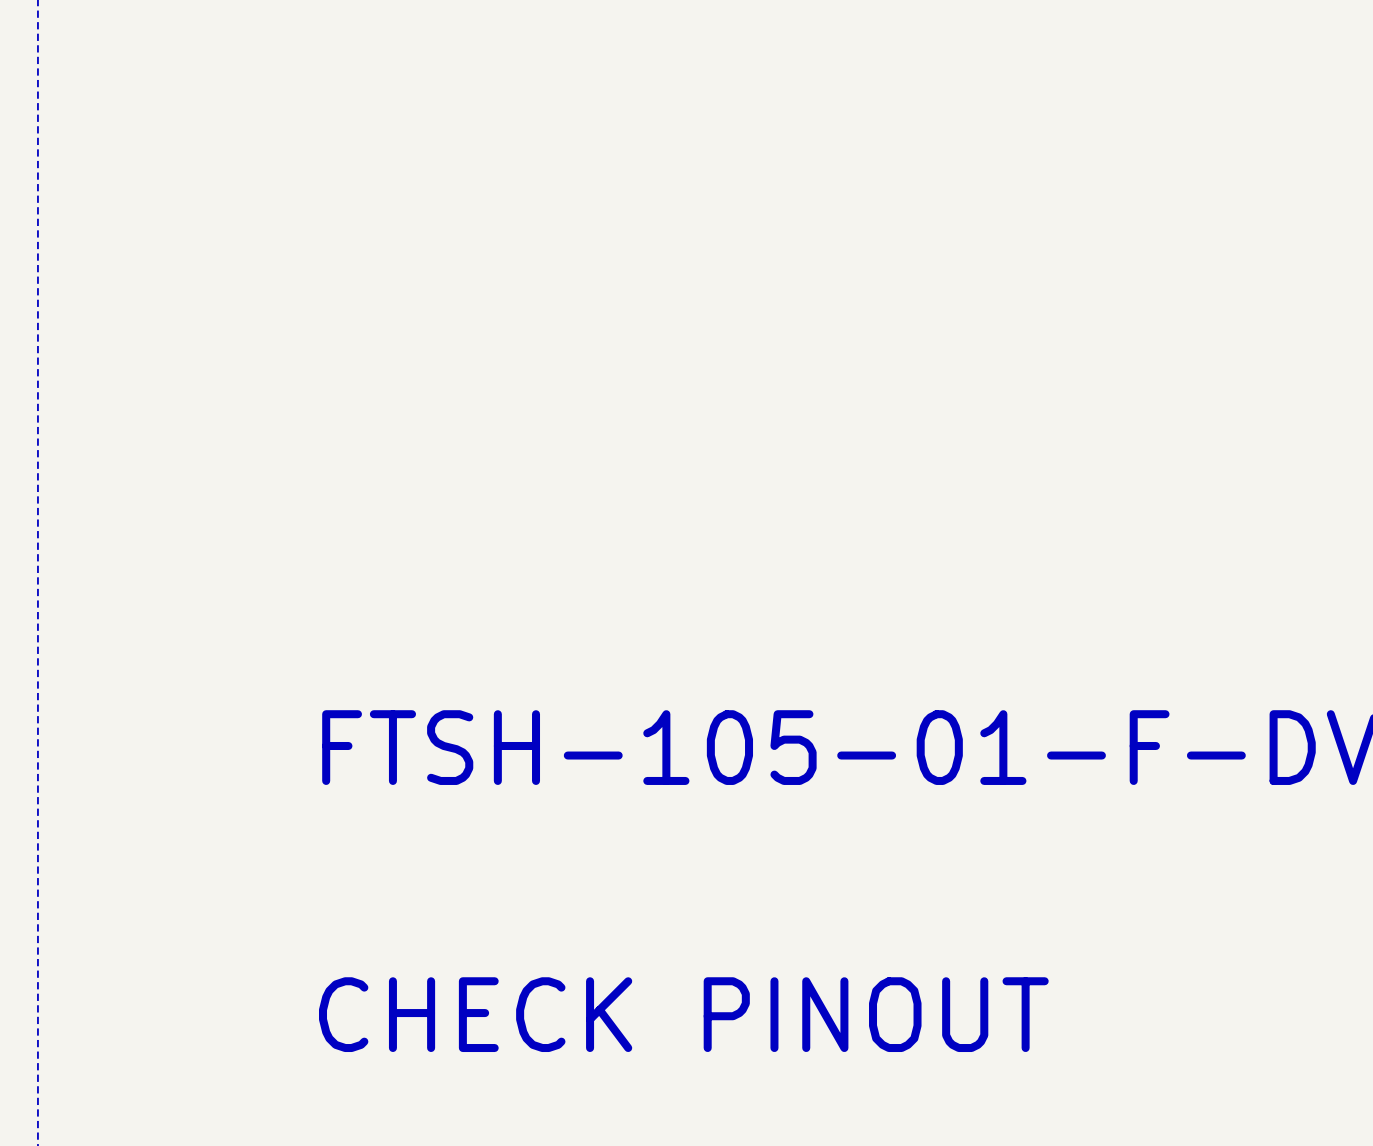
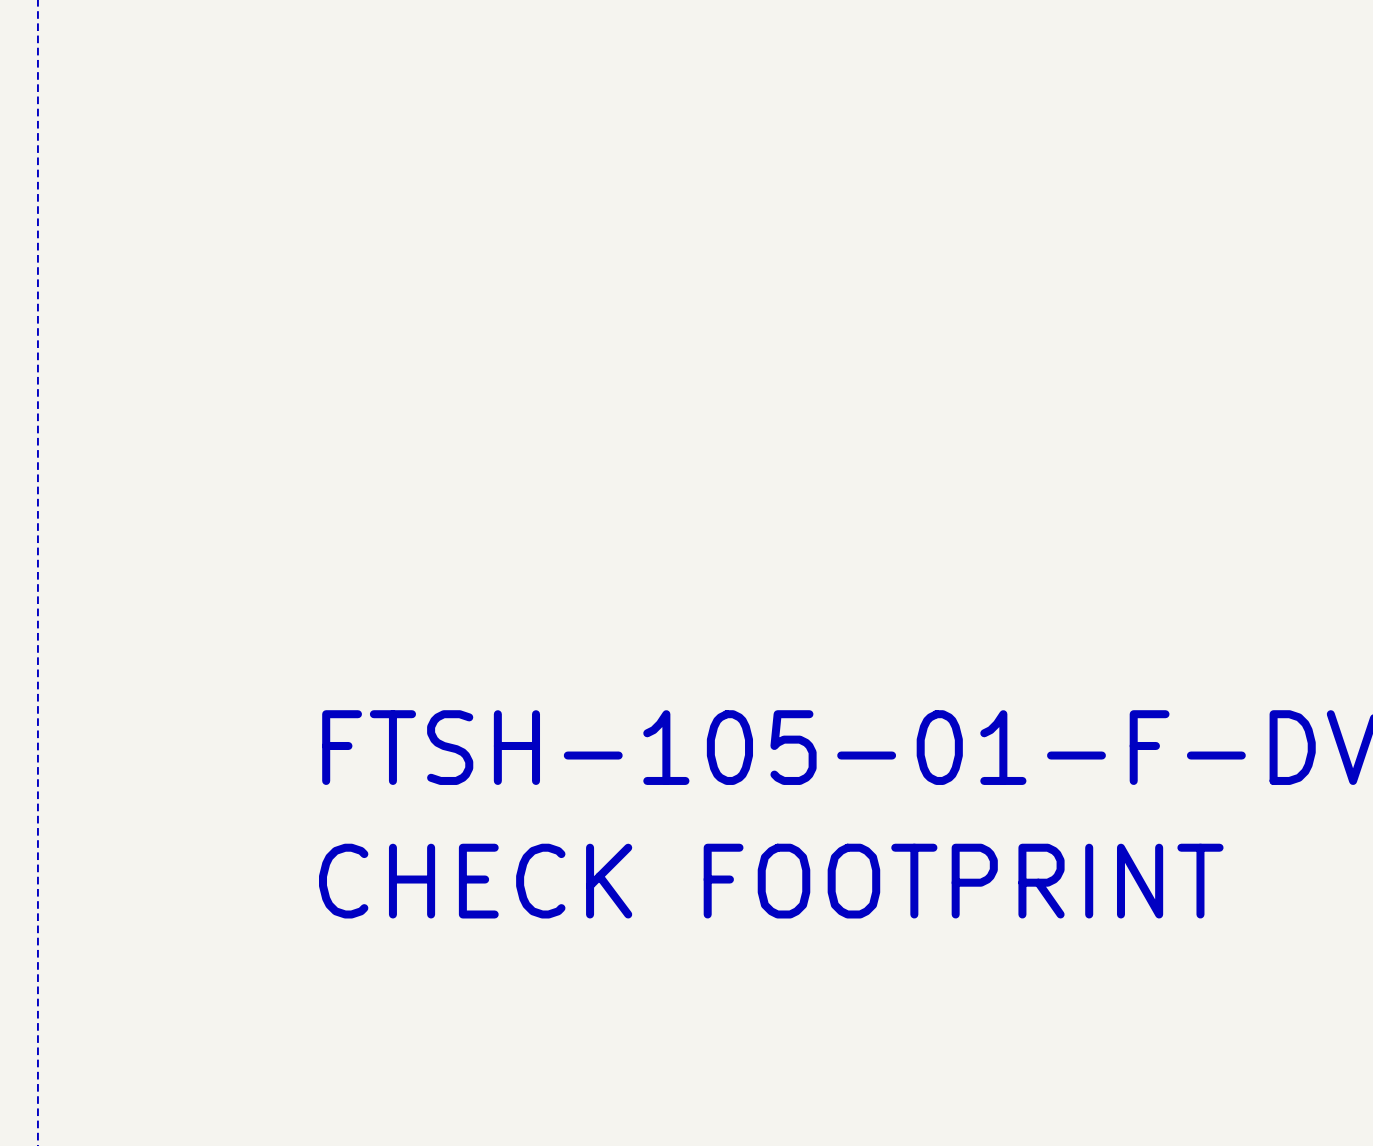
text: CHECK PINOUT (683, 1014) -> CHECK FOOTPRINT (771, 881)

